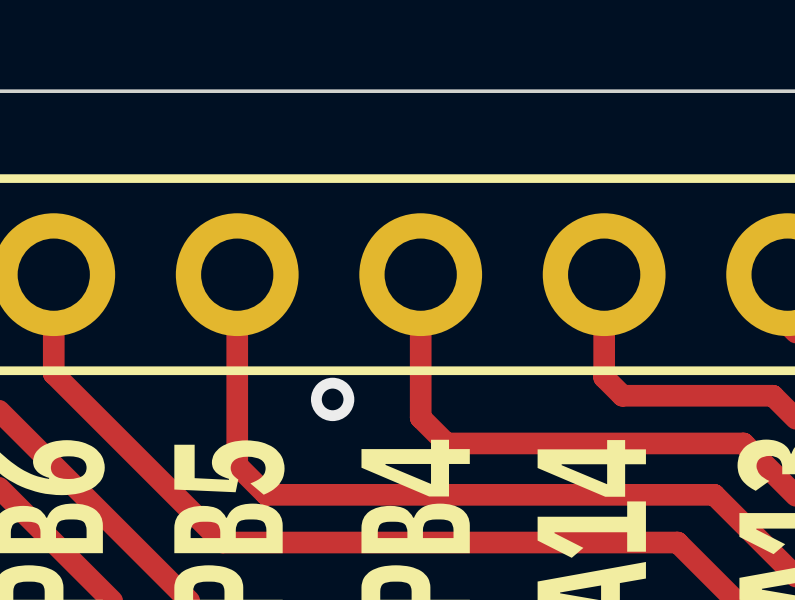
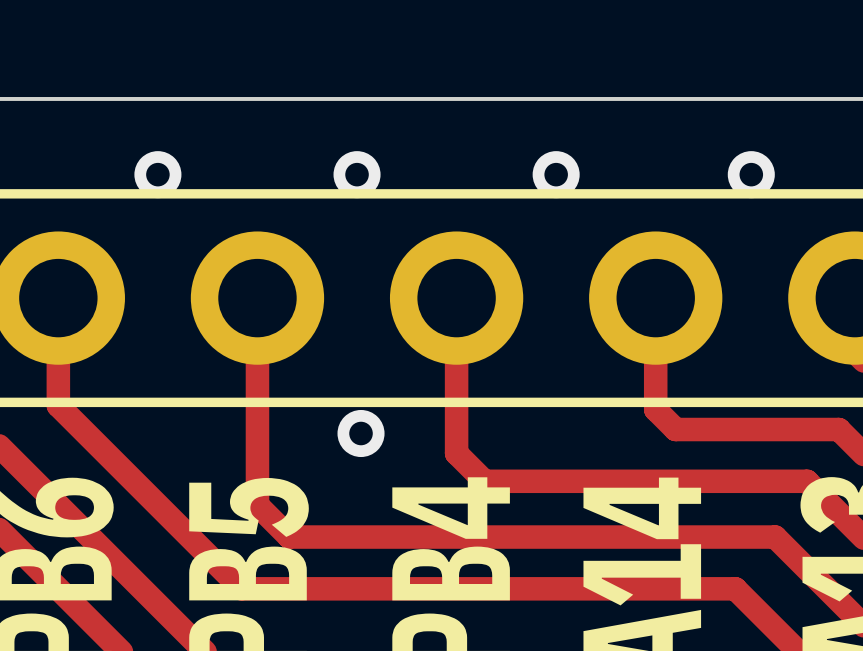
via: none -> (157, 174)
via: none -> (357, 174)
via: none -> (556, 174)
via: none -> (751, 174)

